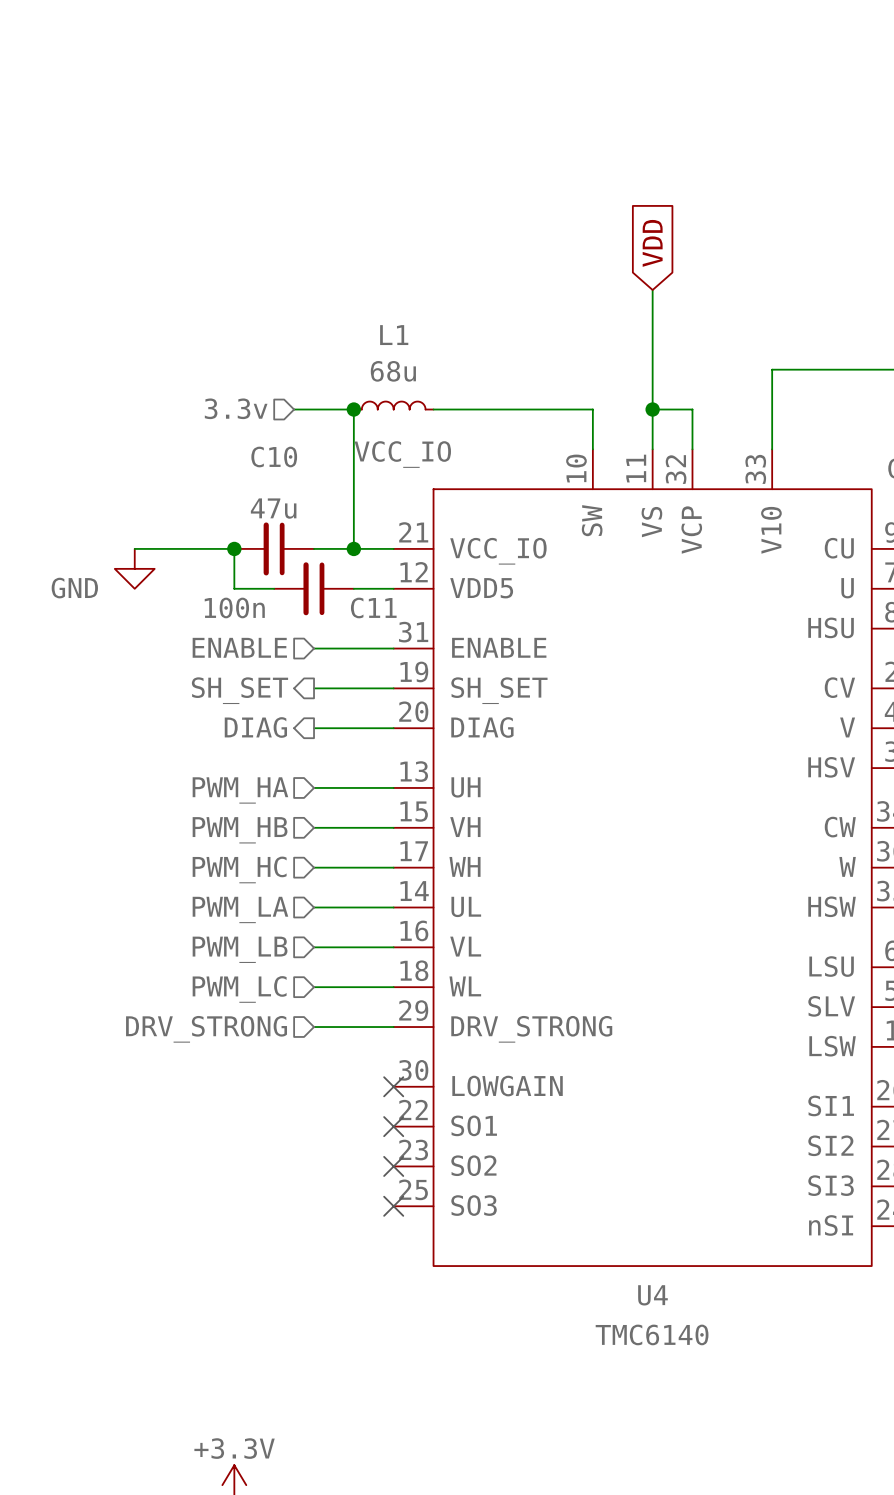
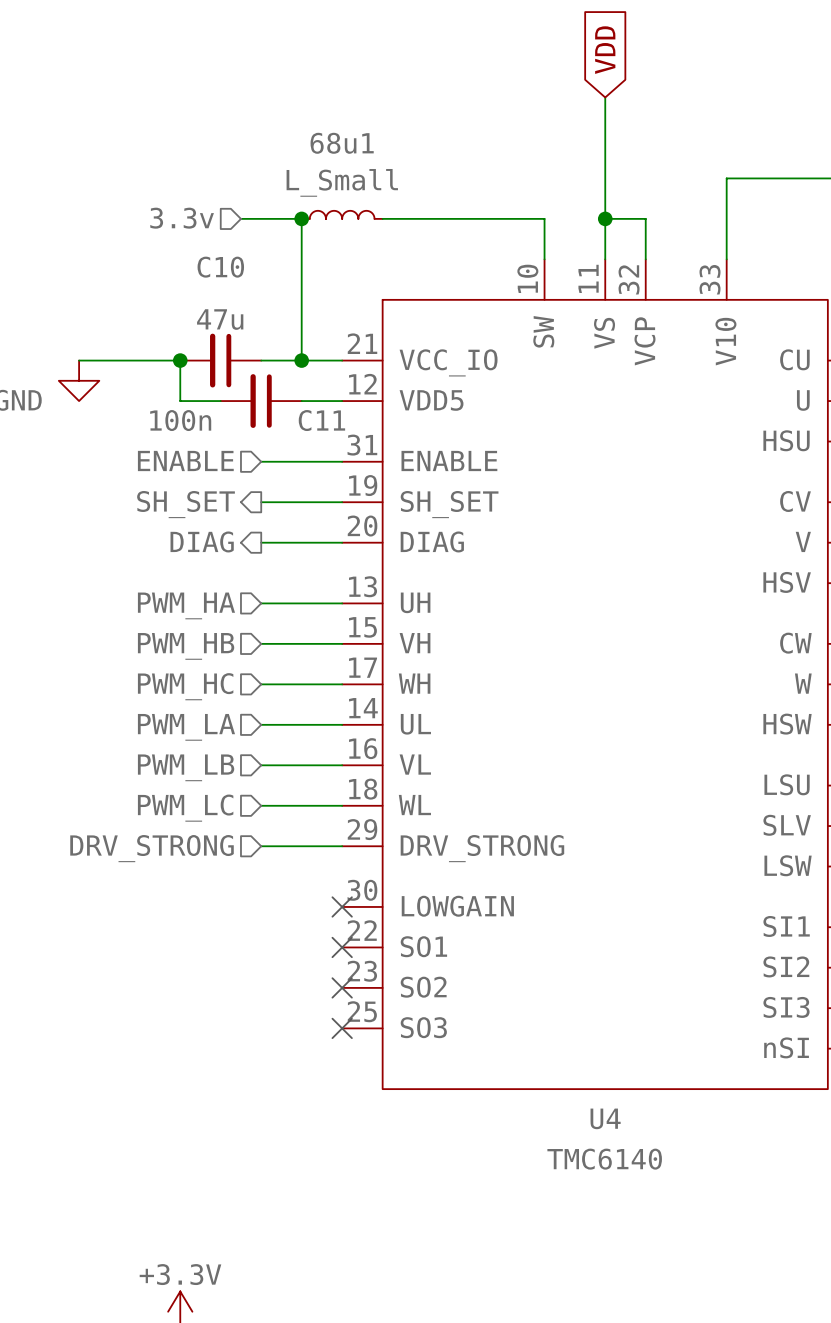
L1 name: L1 (394, 335) -> 68u1 (342, 143)
L1 value: 68u (393, 371) -> L_Small (342, 182)
label: VCC_IO (402, 454) -> none

